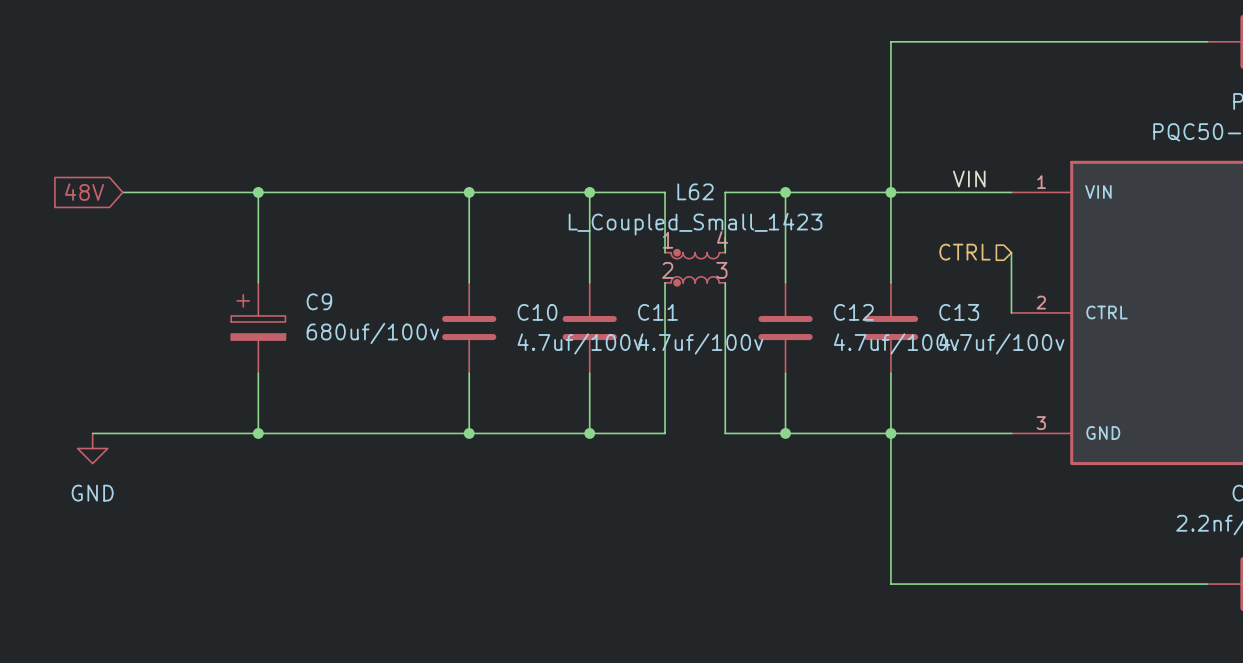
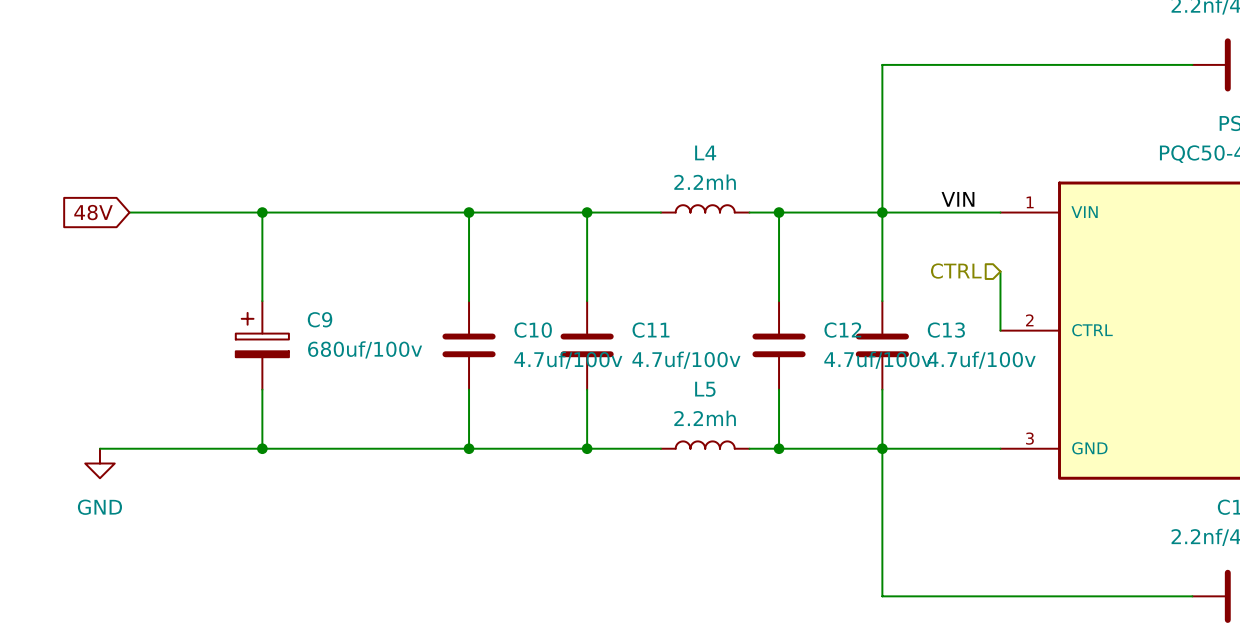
L4: none -> 2.2mh (705, 208)
wire: (665, 192) (665, 252) -> none
wire: (755, 192) (725, 192) (725, 252) -> none
L62: L_Coupled_Small_1423 (695, 267) -> none
wire: (665, 282) (665, 433) -> none
wire: (725, 282) (725, 433) (755, 433) -> none
L5: none -> 2.2mh (705, 445)

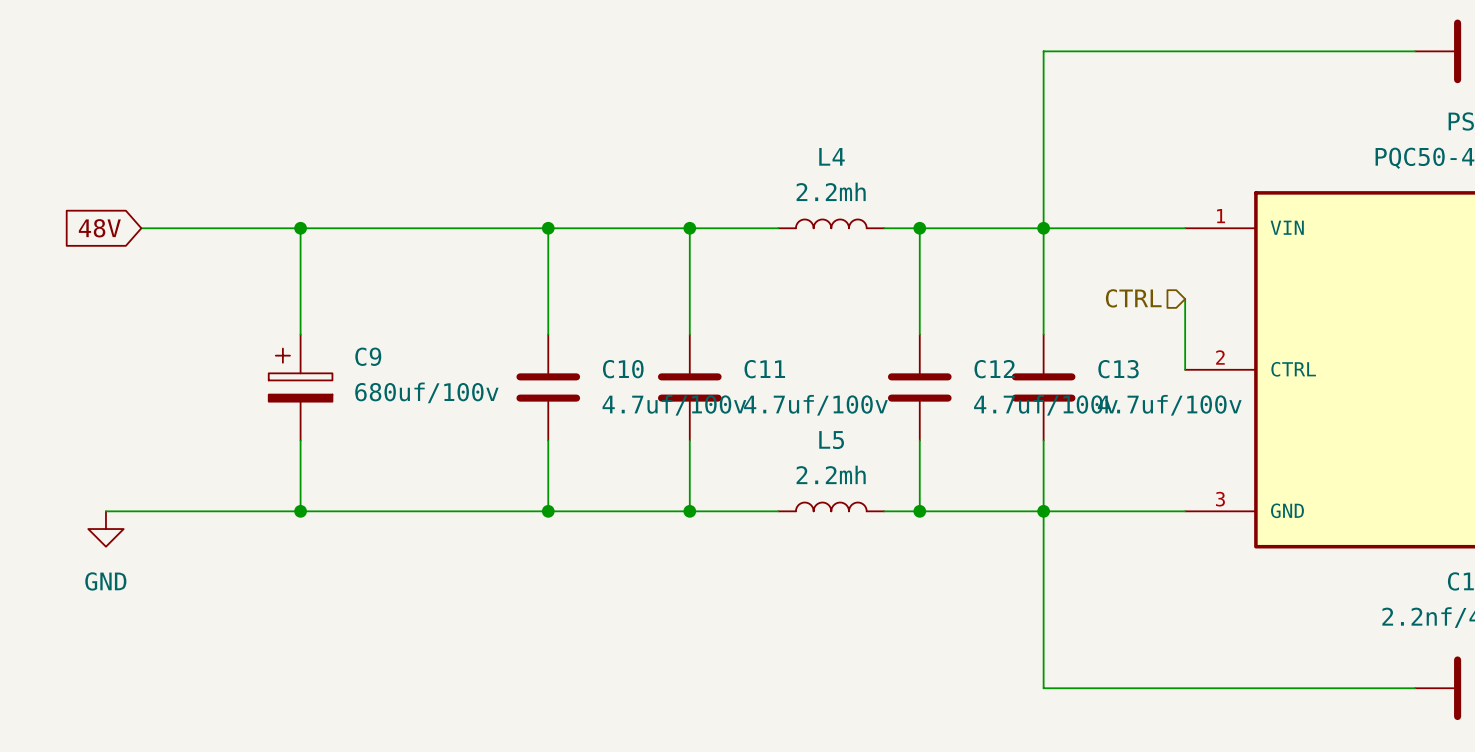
label: VIN (957, 199) -> none

